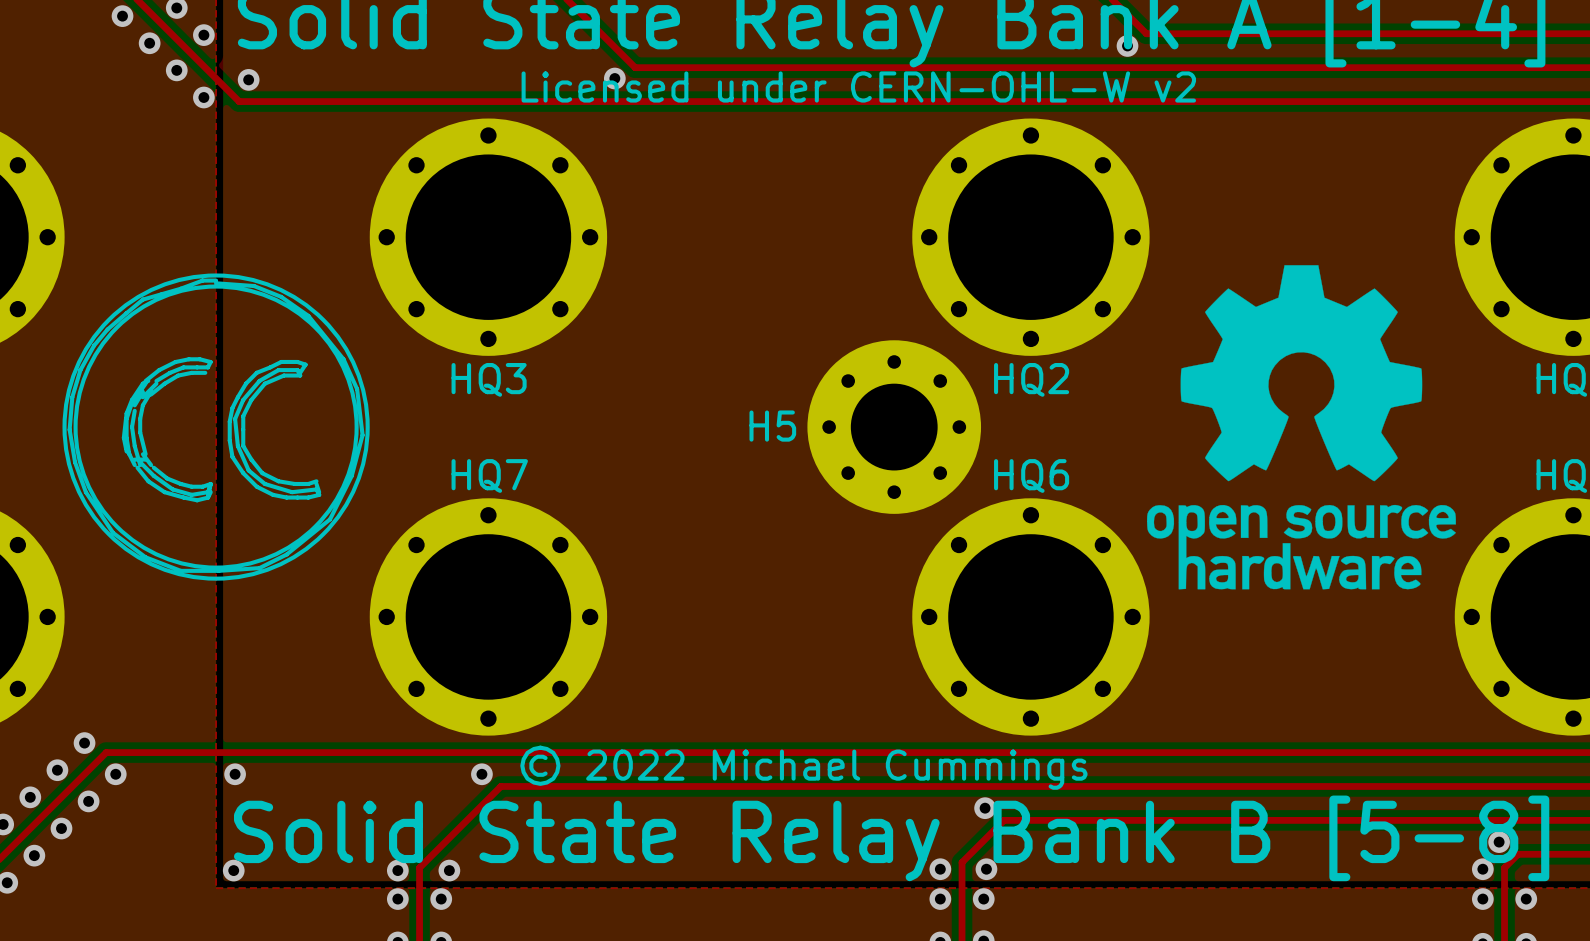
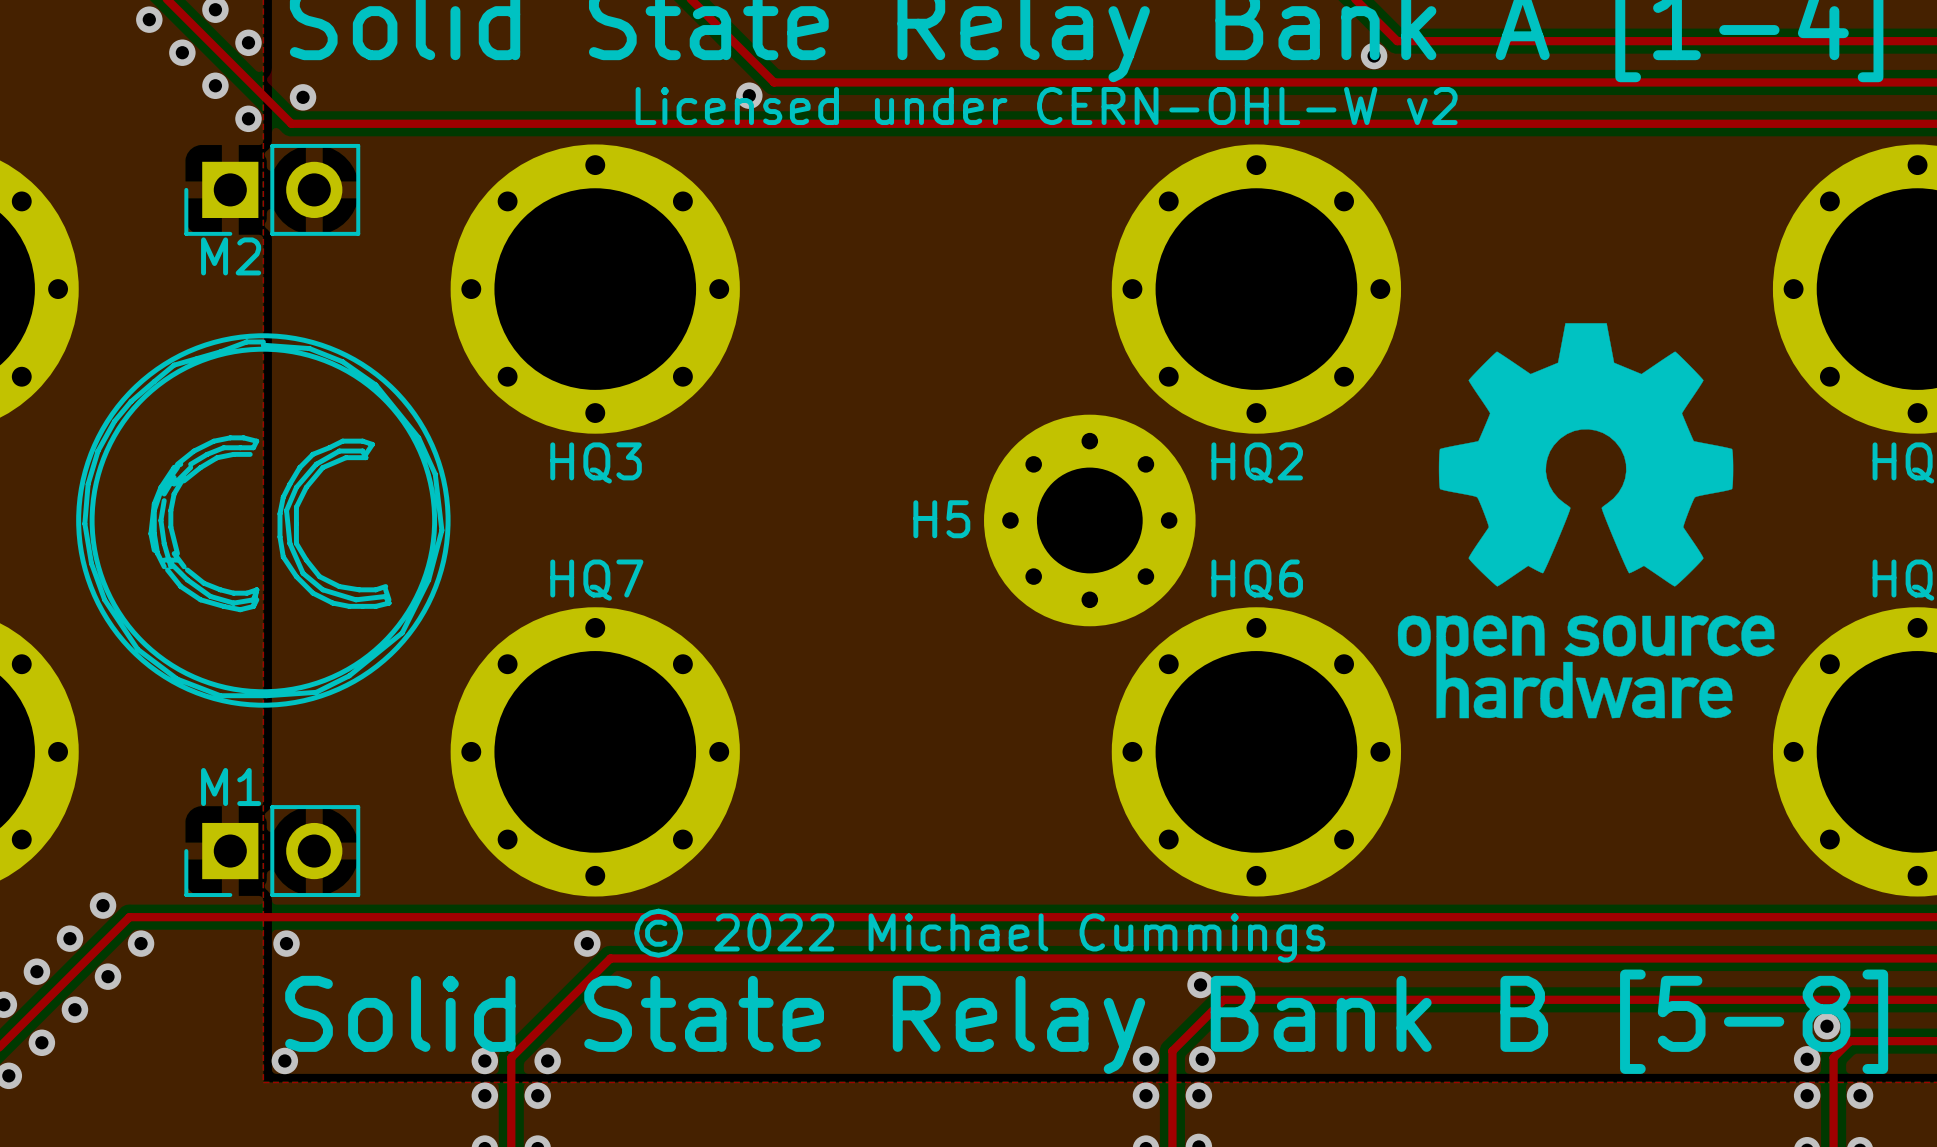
M2: none -> (272, 189)
M1: none -> (272, 851)

